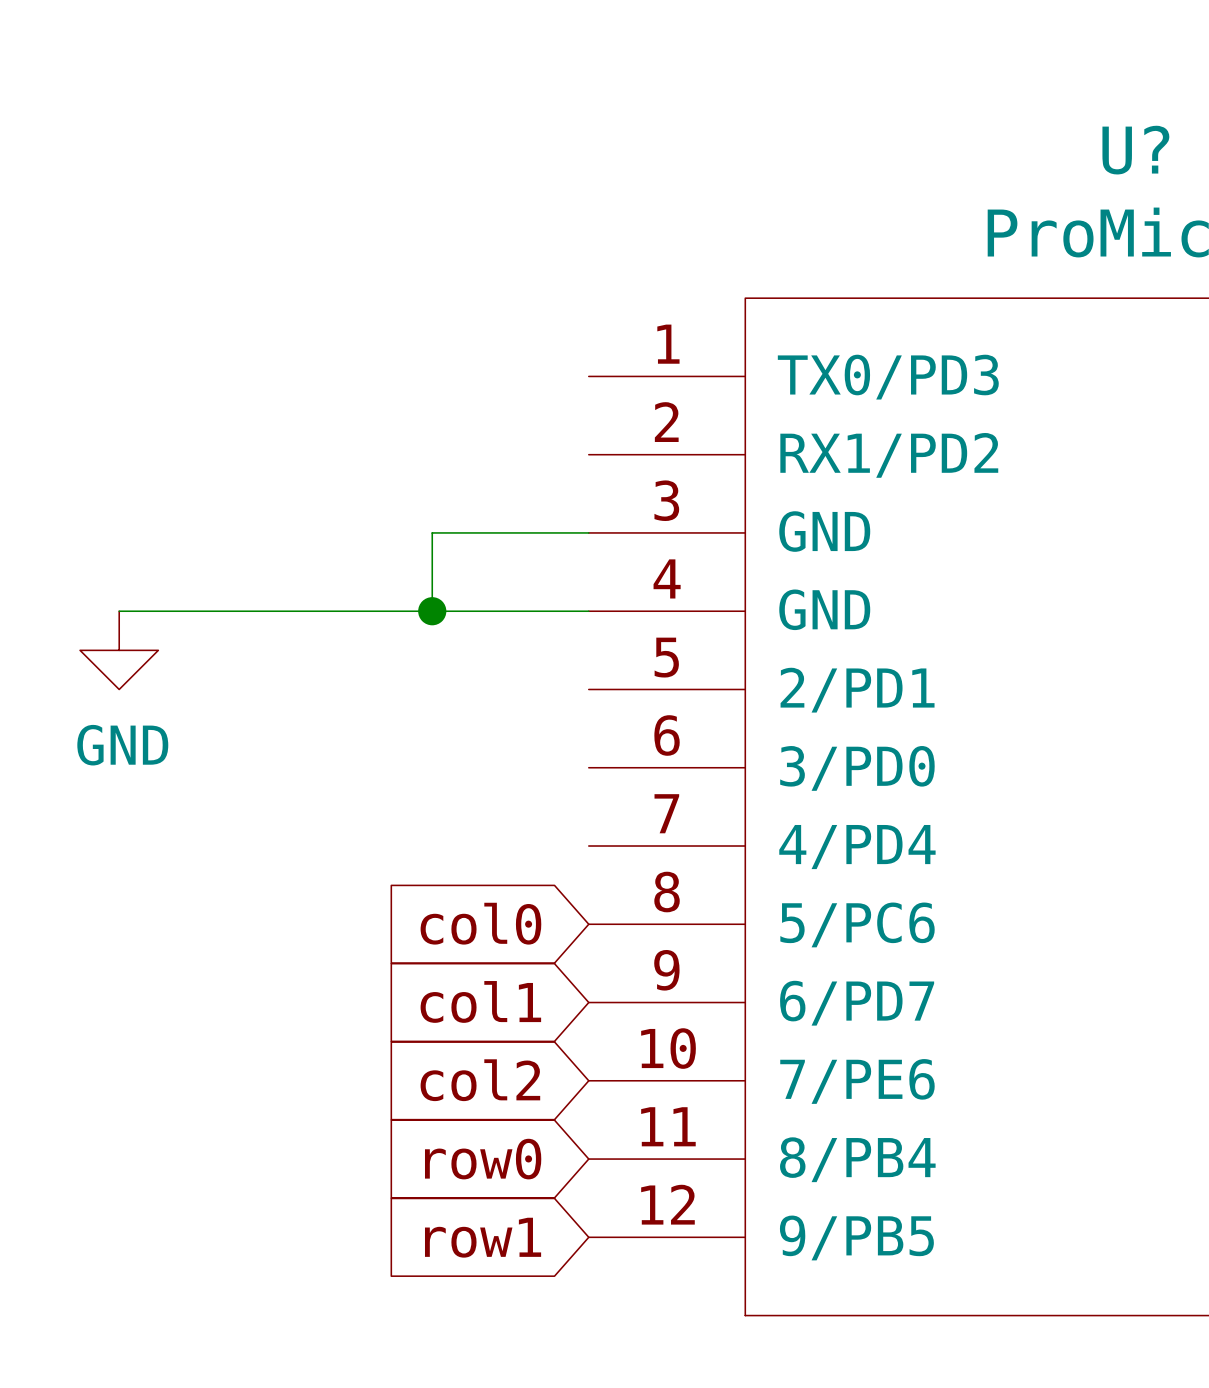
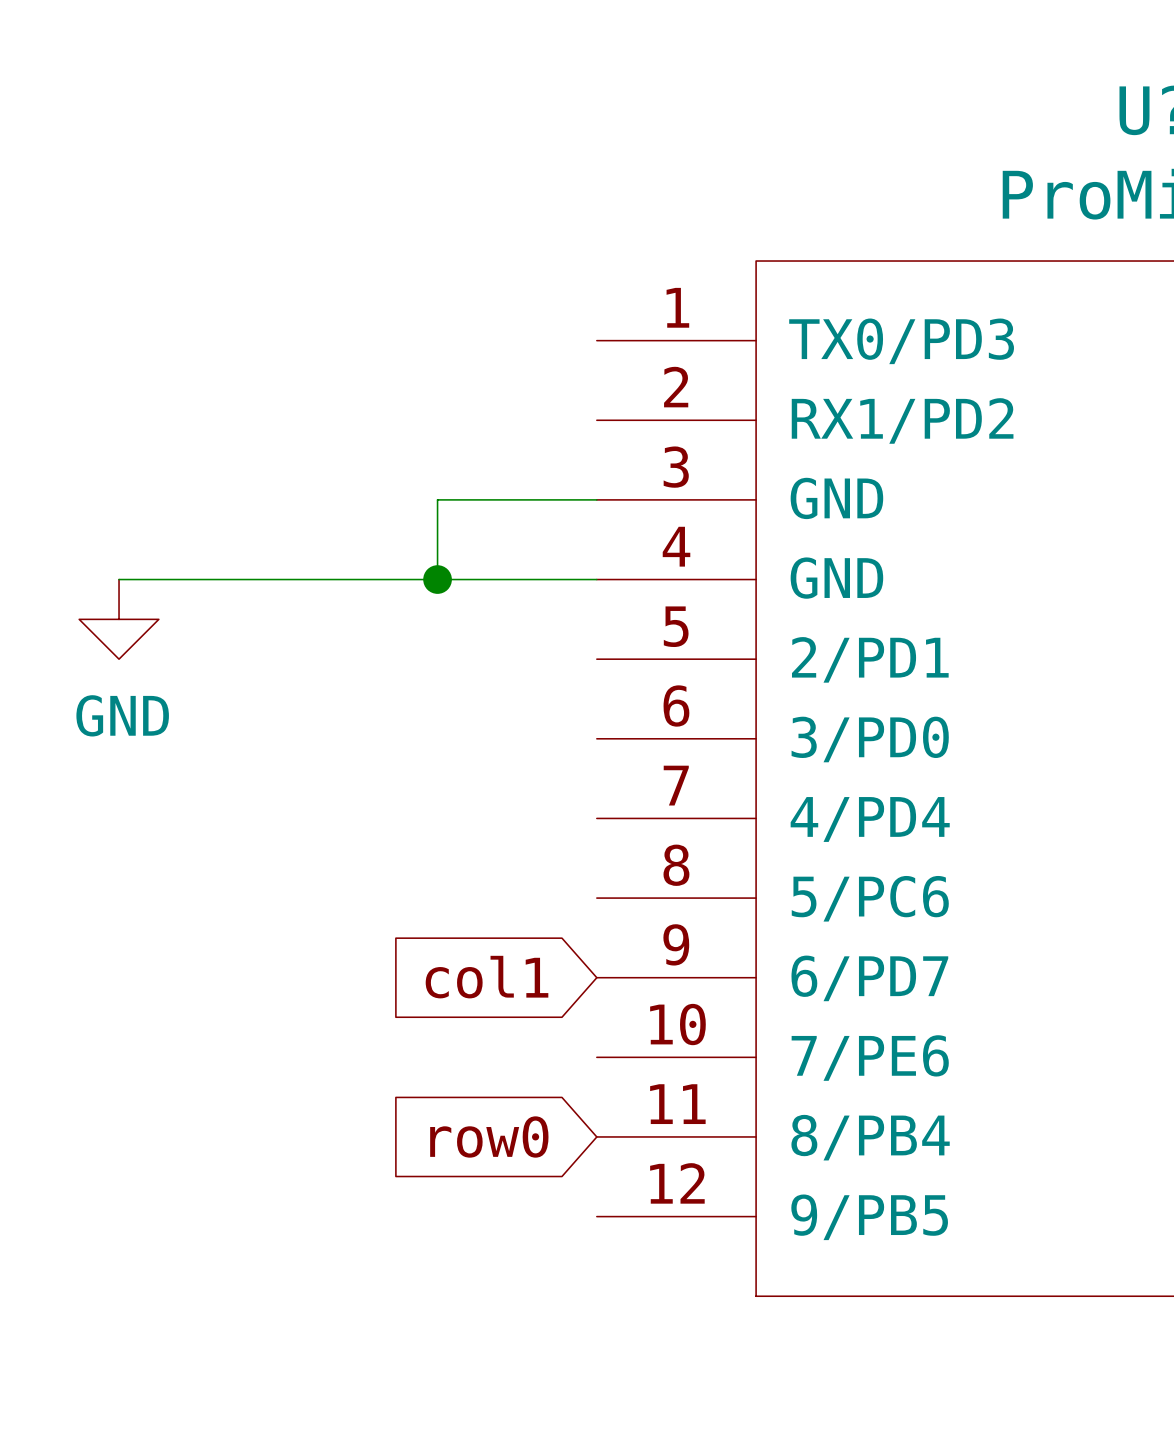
global label: col0 (480, 923) -> none
global label: col2 (480, 1080) -> none
global label: row1 (483, 1237) -> none

